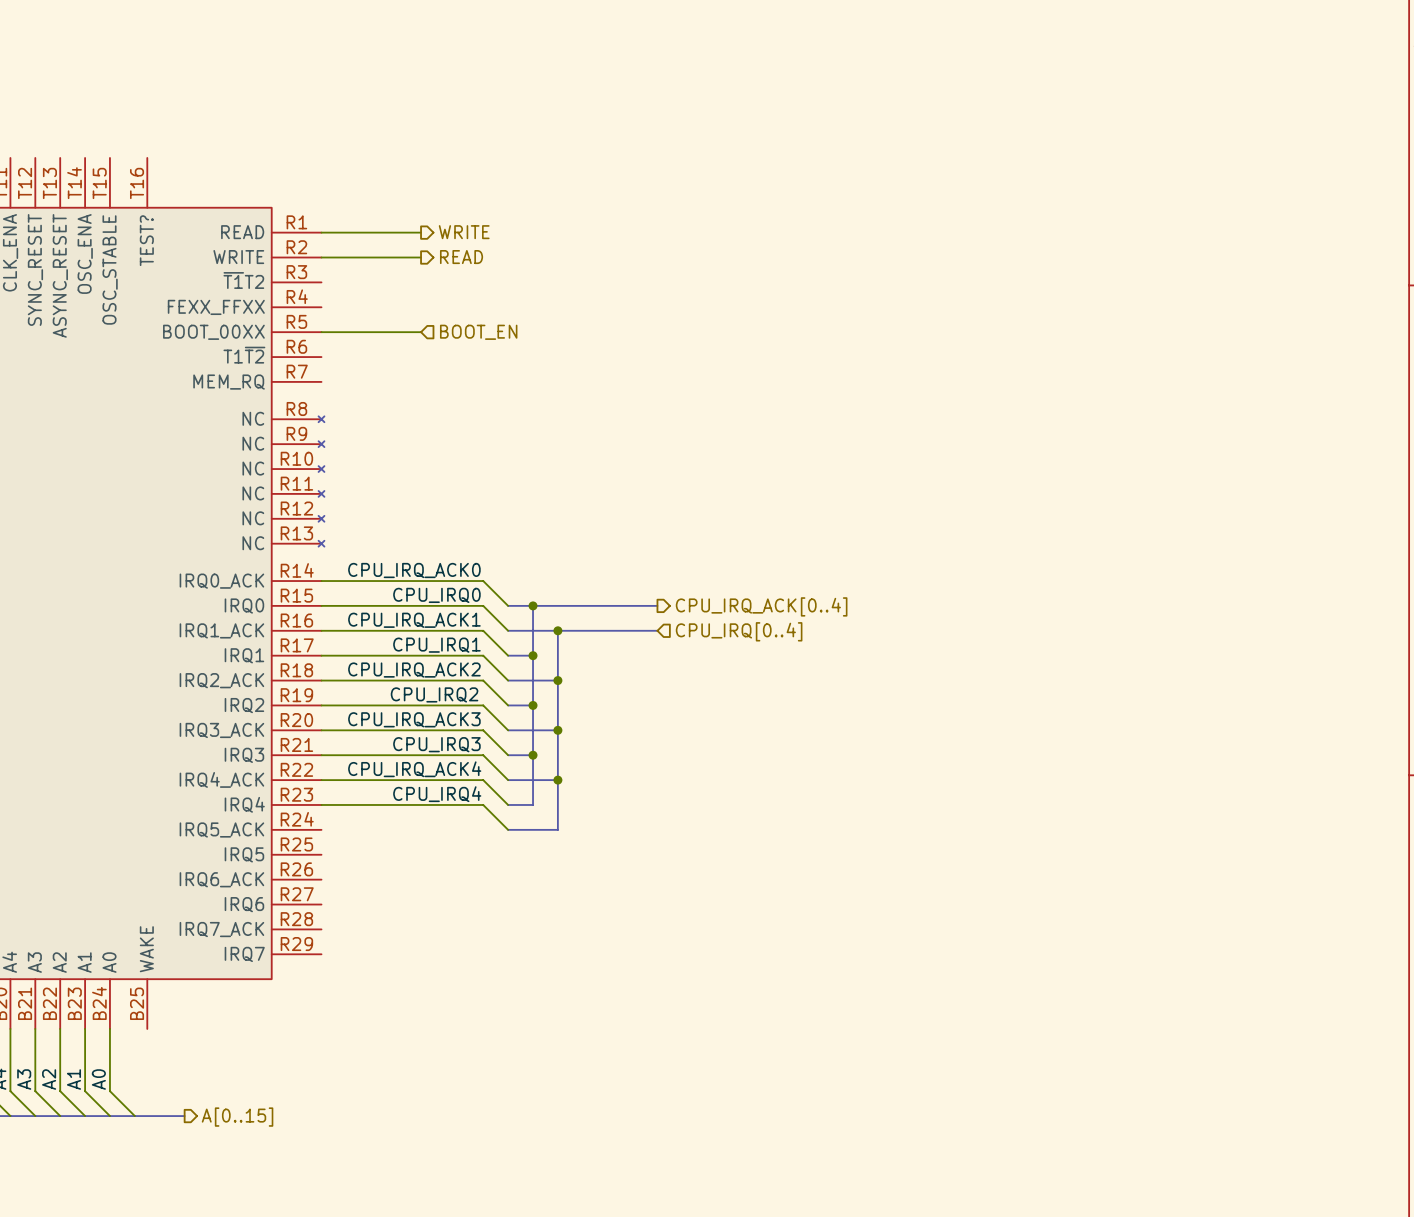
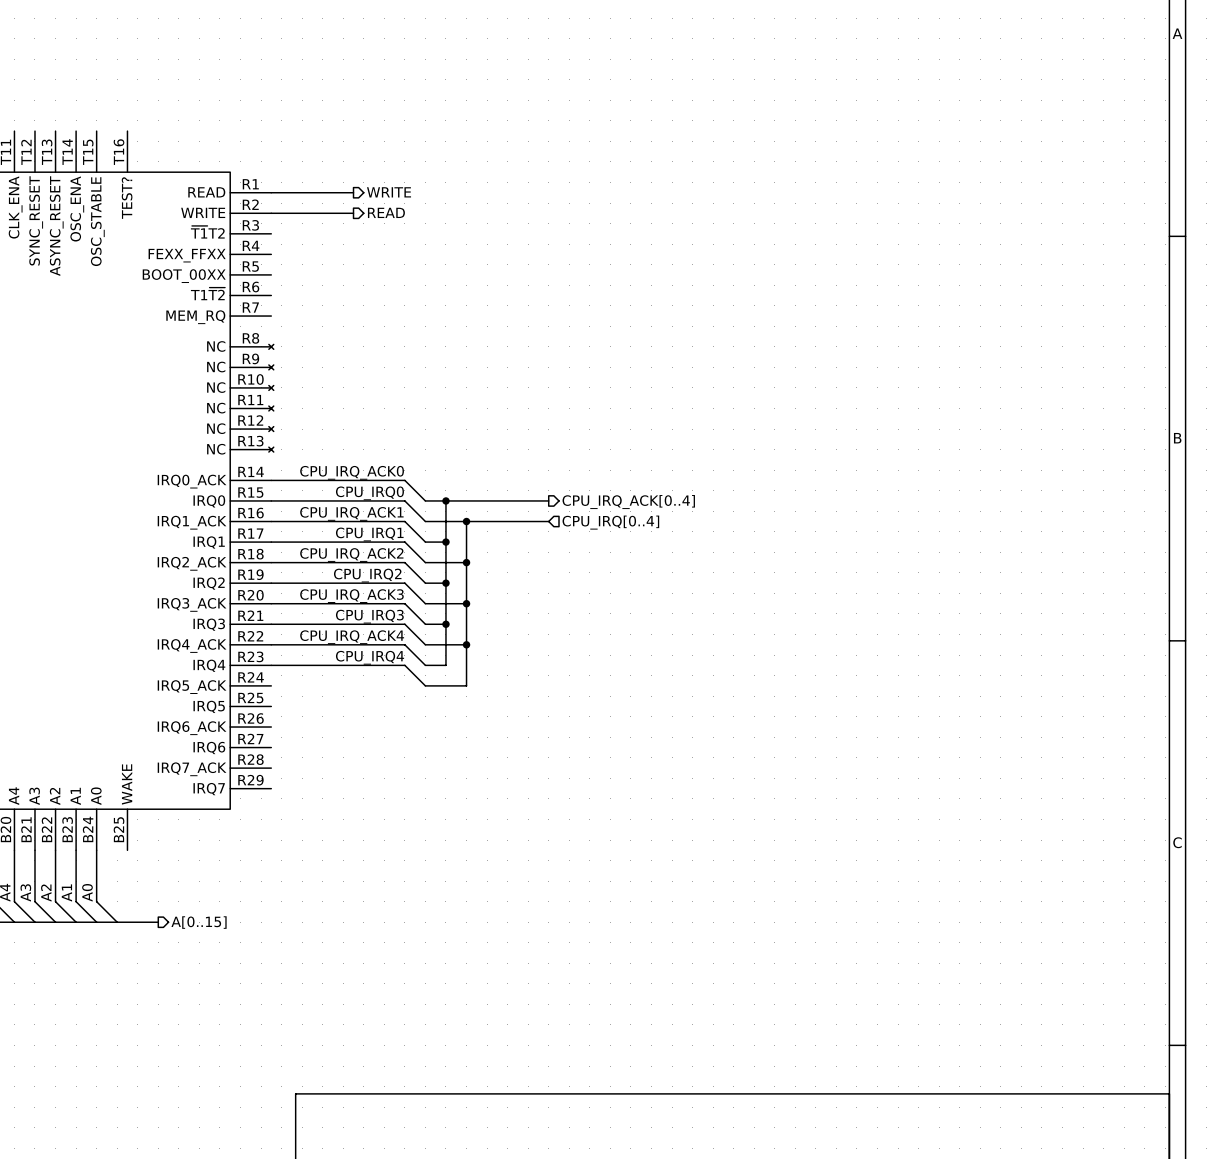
wire: (321, 332) (421, 332) -> none
hierarchical label: BOOT_EN (478, 332) -> none

